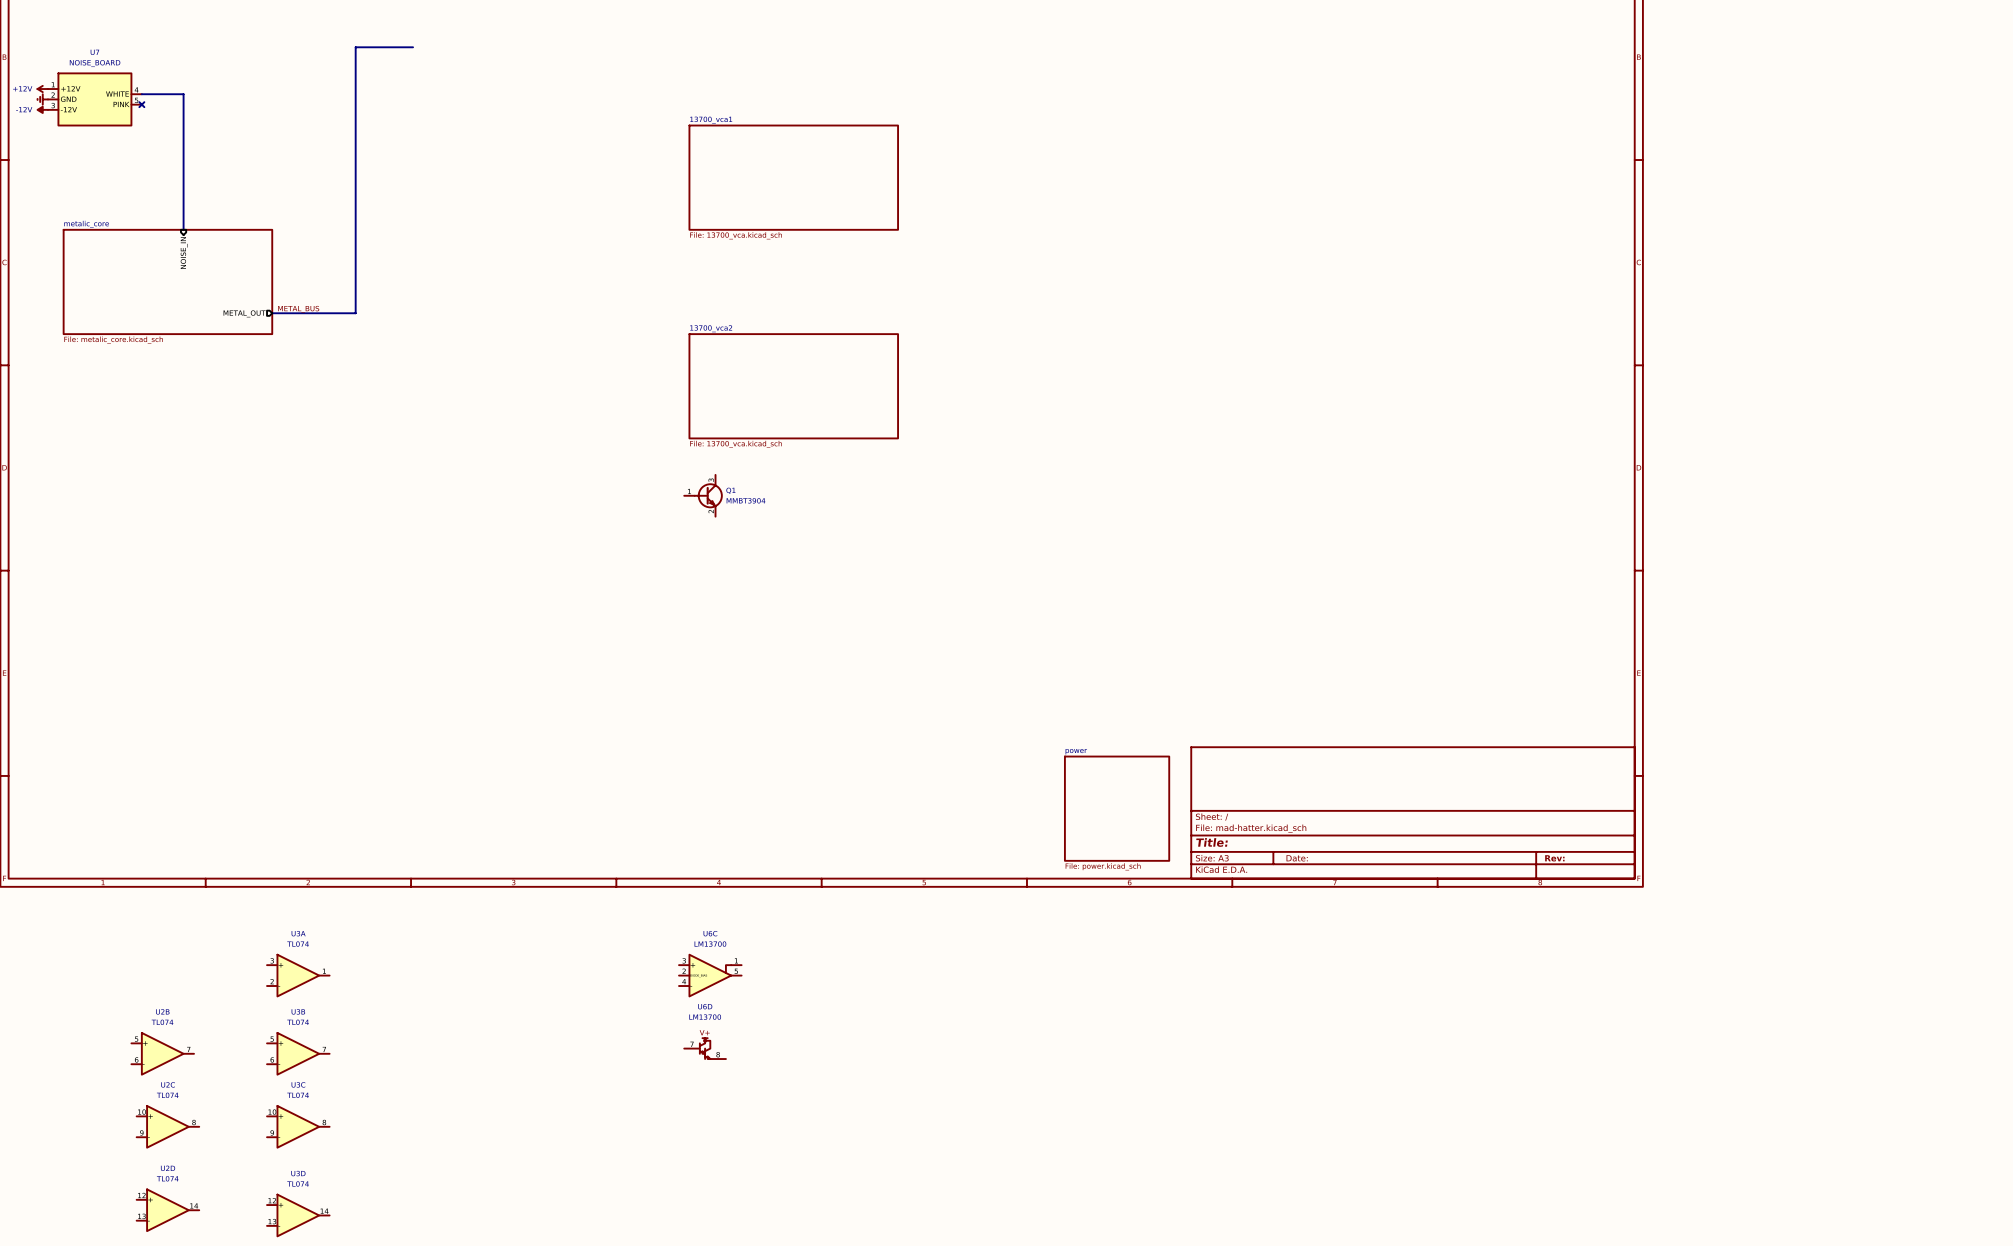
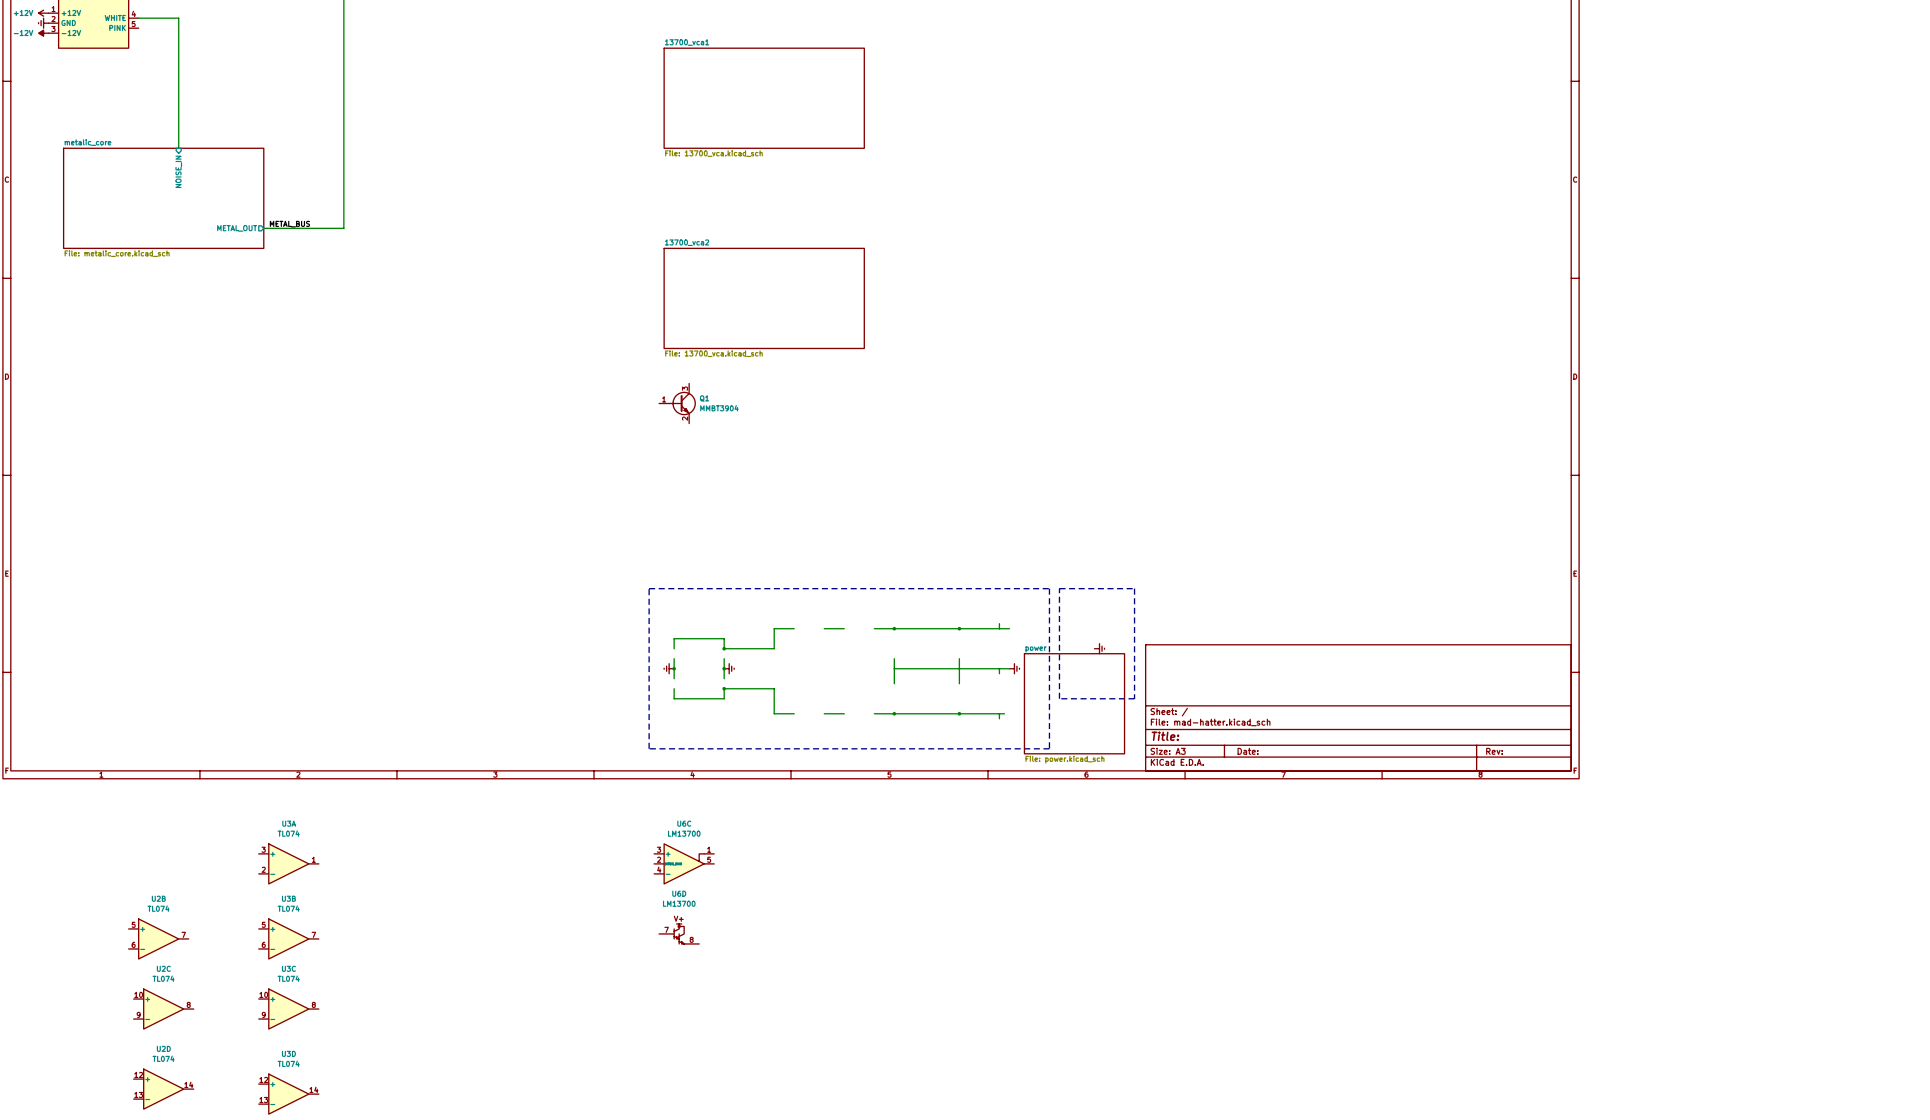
no-connect mark: (141, 104) -> none
line: none -> (649, 588) (1049, 588) (1049, 748) (649, 748) (649, 588)
line: none -> (1059, 588) (1134, 588) (1134, 698) (1059, 698) (1059, 588)
wire: none -> (999, 623) (999, 628)
wire: none -> (794, 628) (774, 628) (774, 648) (724, 648) (724, 638) (674, 638) (674, 648)
wire: none -> (824, 628) (844, 628)
wire: none -> (874, 628) (1009, 628)
junction: none -> (894, 628)
junction: none -> (959, 628)
junction: none -> (724, 648)
power symbol: none -> (1099, 648)
wire: none -> (674, 658) (674, 678)
wire: none -> (724, 658) (724, 678)
wire: none -> (894, 658) (894, 683)
wire: none -> (959, 658) (959, 683)
power symbol: none -> (669, 668)
junction: none -> (674, 668)
junction: none -> (724, 668)
power symbol: none -> (729, 668)
wire: none -> (894, 668) (1009, 668)
wire: none -> (999, 668) (999, 673)
power symbol: none -> (1014, 668)
wire: none -> (674, 688) (674, 698) (724, 698) (724, 688) (774, 688) (774, 713) (794, 713)
junction: none -> (724, 688)
wire: none -> (824, 713) (844, 713)
wire: none -> (874, 713) (1004, 713)
junction: none -> (894, 713)
junction: none -> (959, 713)
wire: none -> (999, 713) (999, 718)

